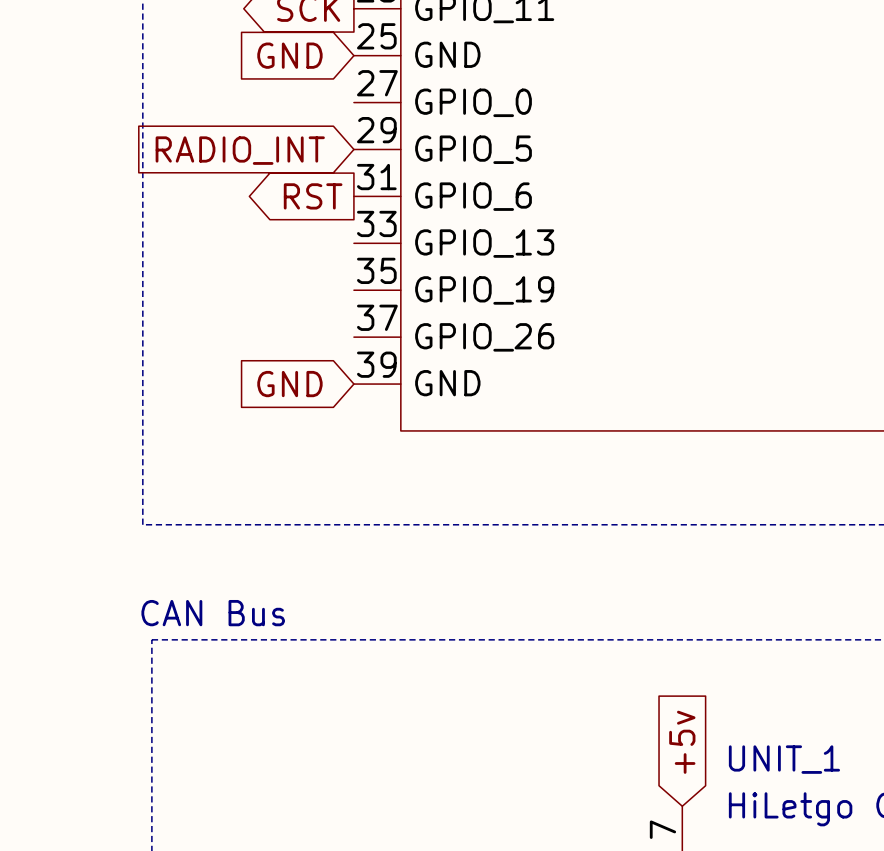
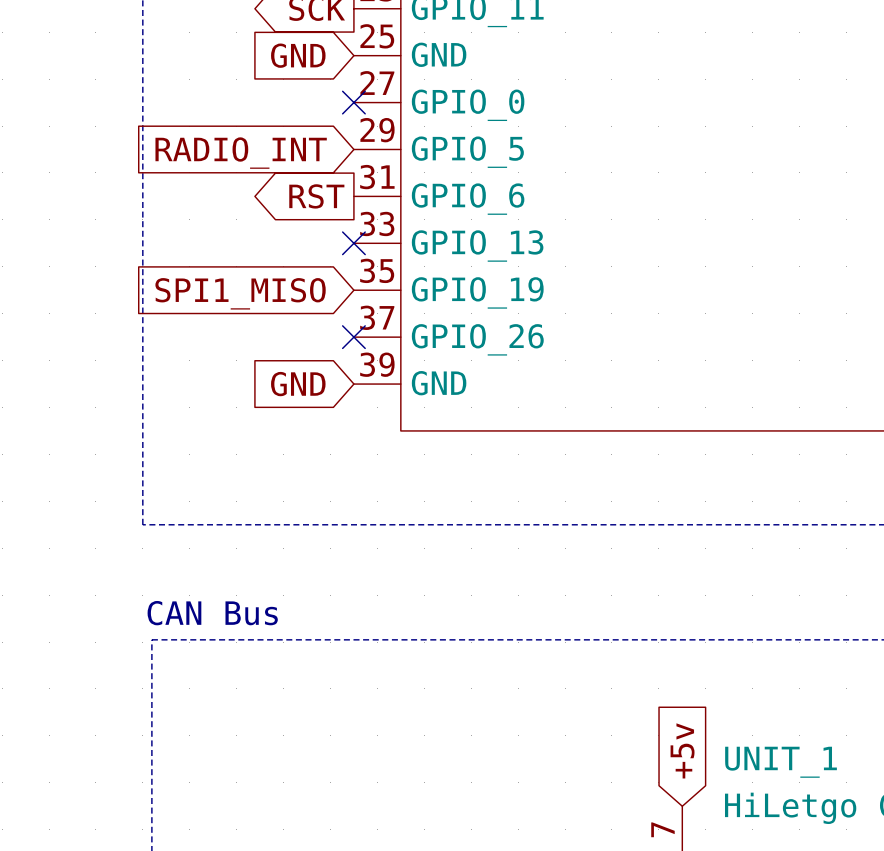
no-connect mark: none -> (353, 102)
no-connect mark: none -> (353, 243)
global label: none -> SPI1_MISO (240, 293)
no-connect mark: none -> (353, 337)

